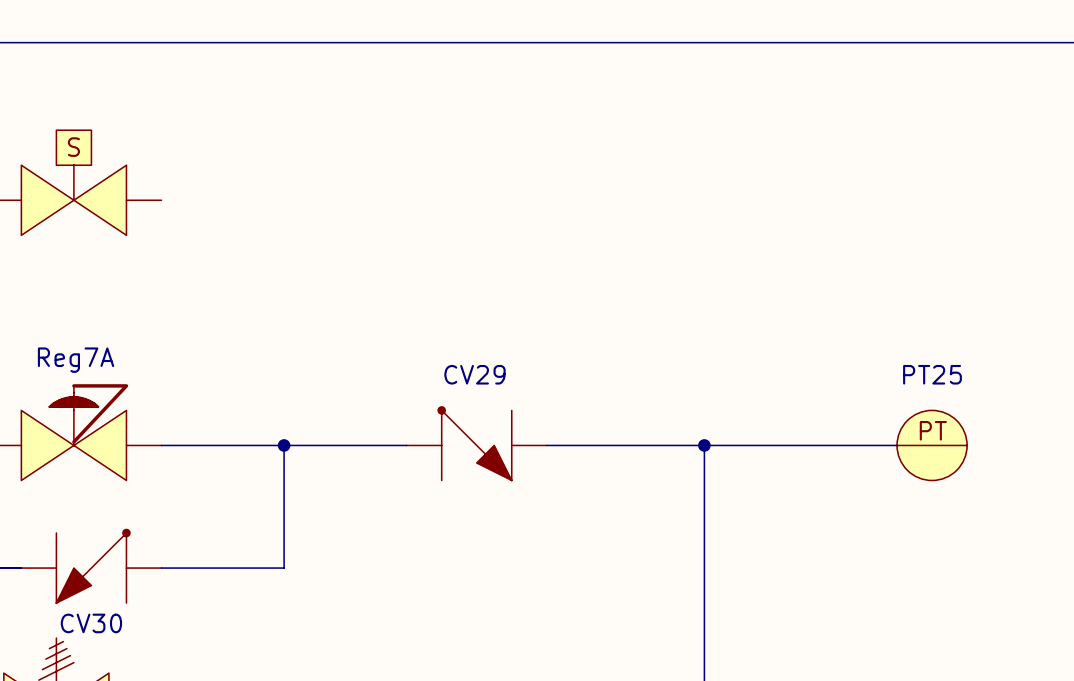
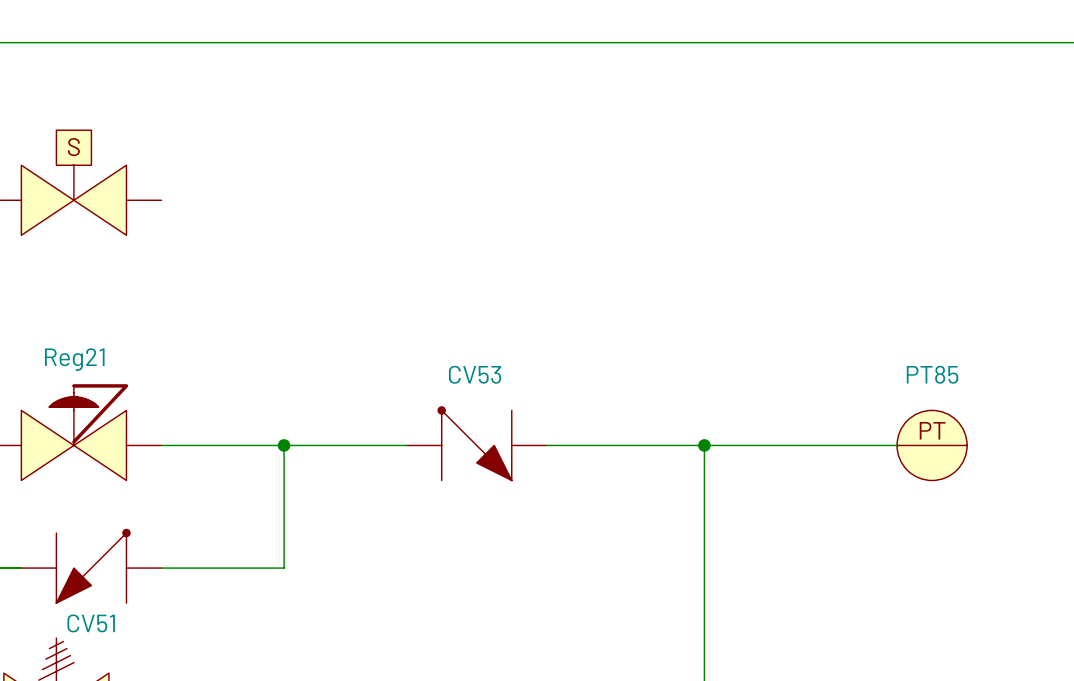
Reg7A name: Reg7A (76, 360) -> Reg21 (74, 359)
CV29 name: CV29 (474, 374) -> CV53 (475, 374)
PT25 name: PT25 (932, 374) -> PT85 (932, 374)
CV30 name: CV30 (91, 623) -> CV51 (91, 623)

